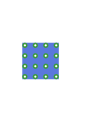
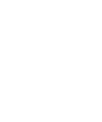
part: (40, 60) -> none

